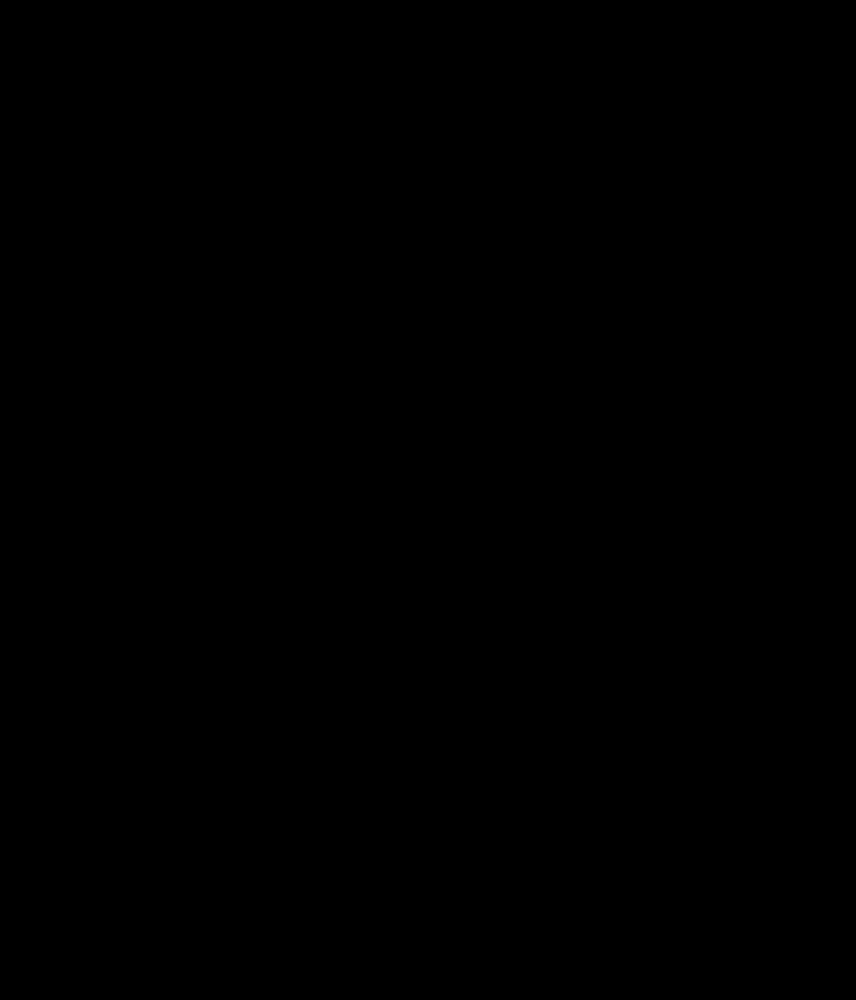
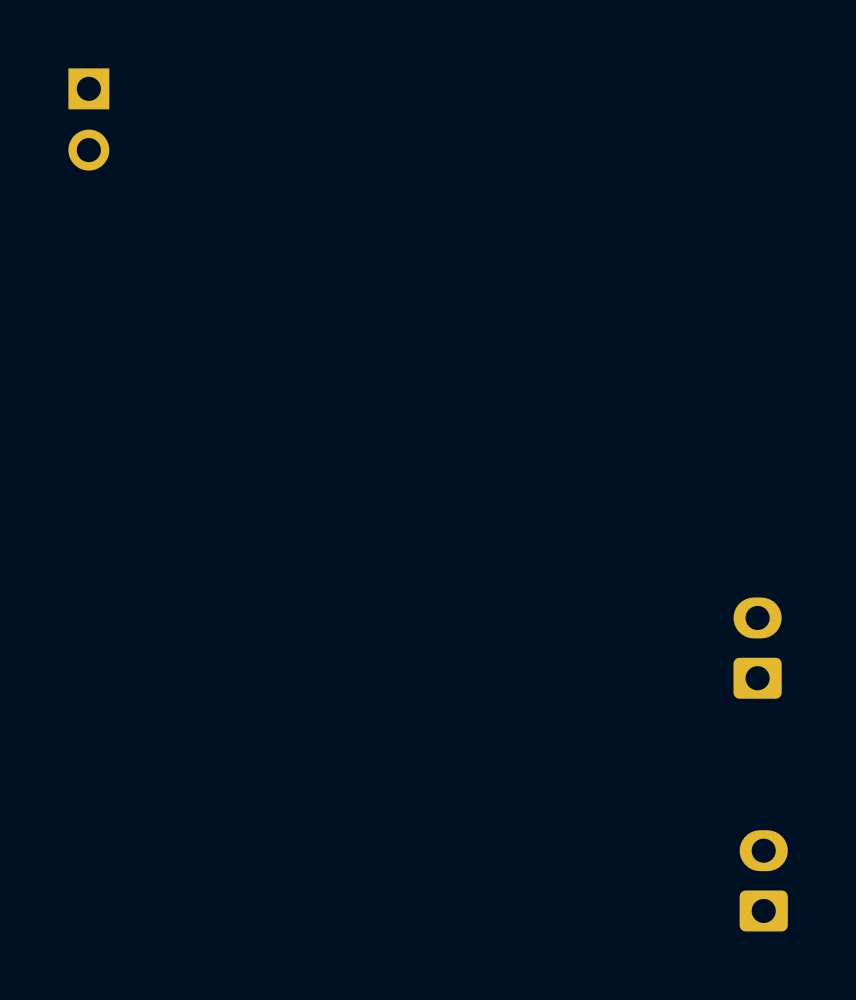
part: none -> (88, 119)
part: none -> (757, 648)
part: none -> (763, 880)

